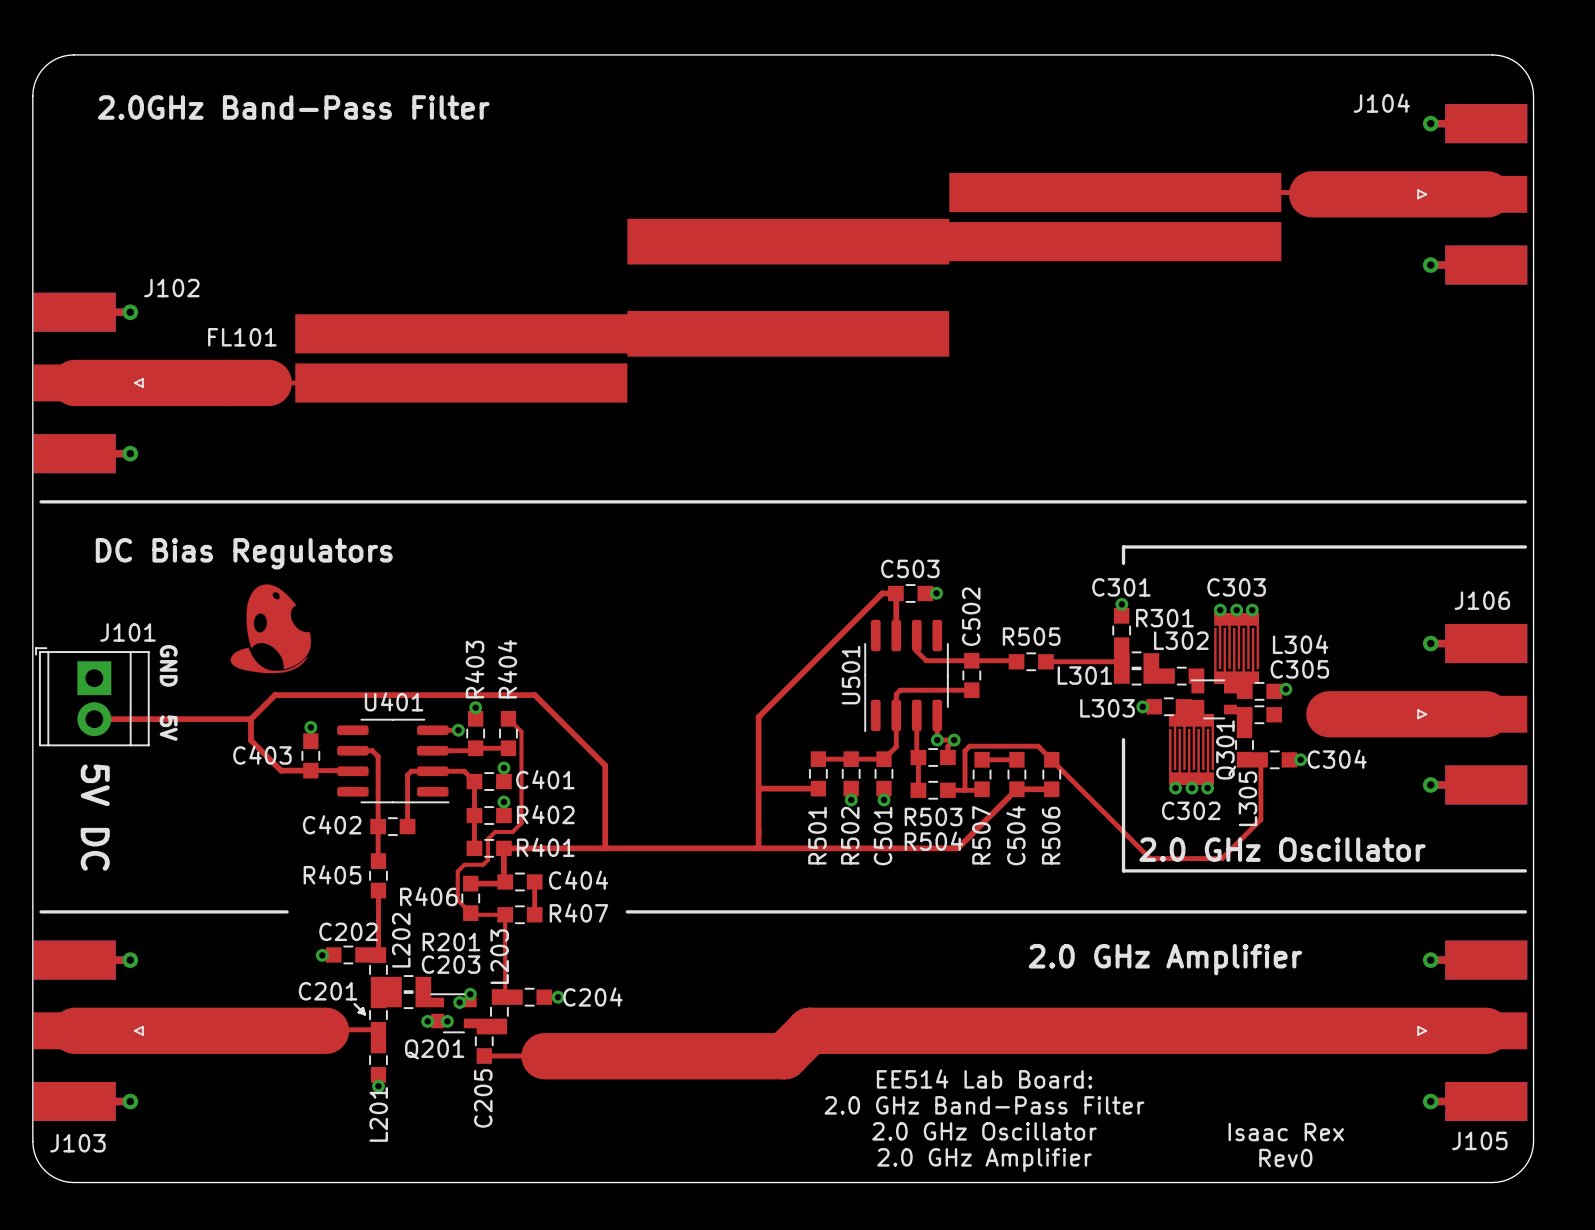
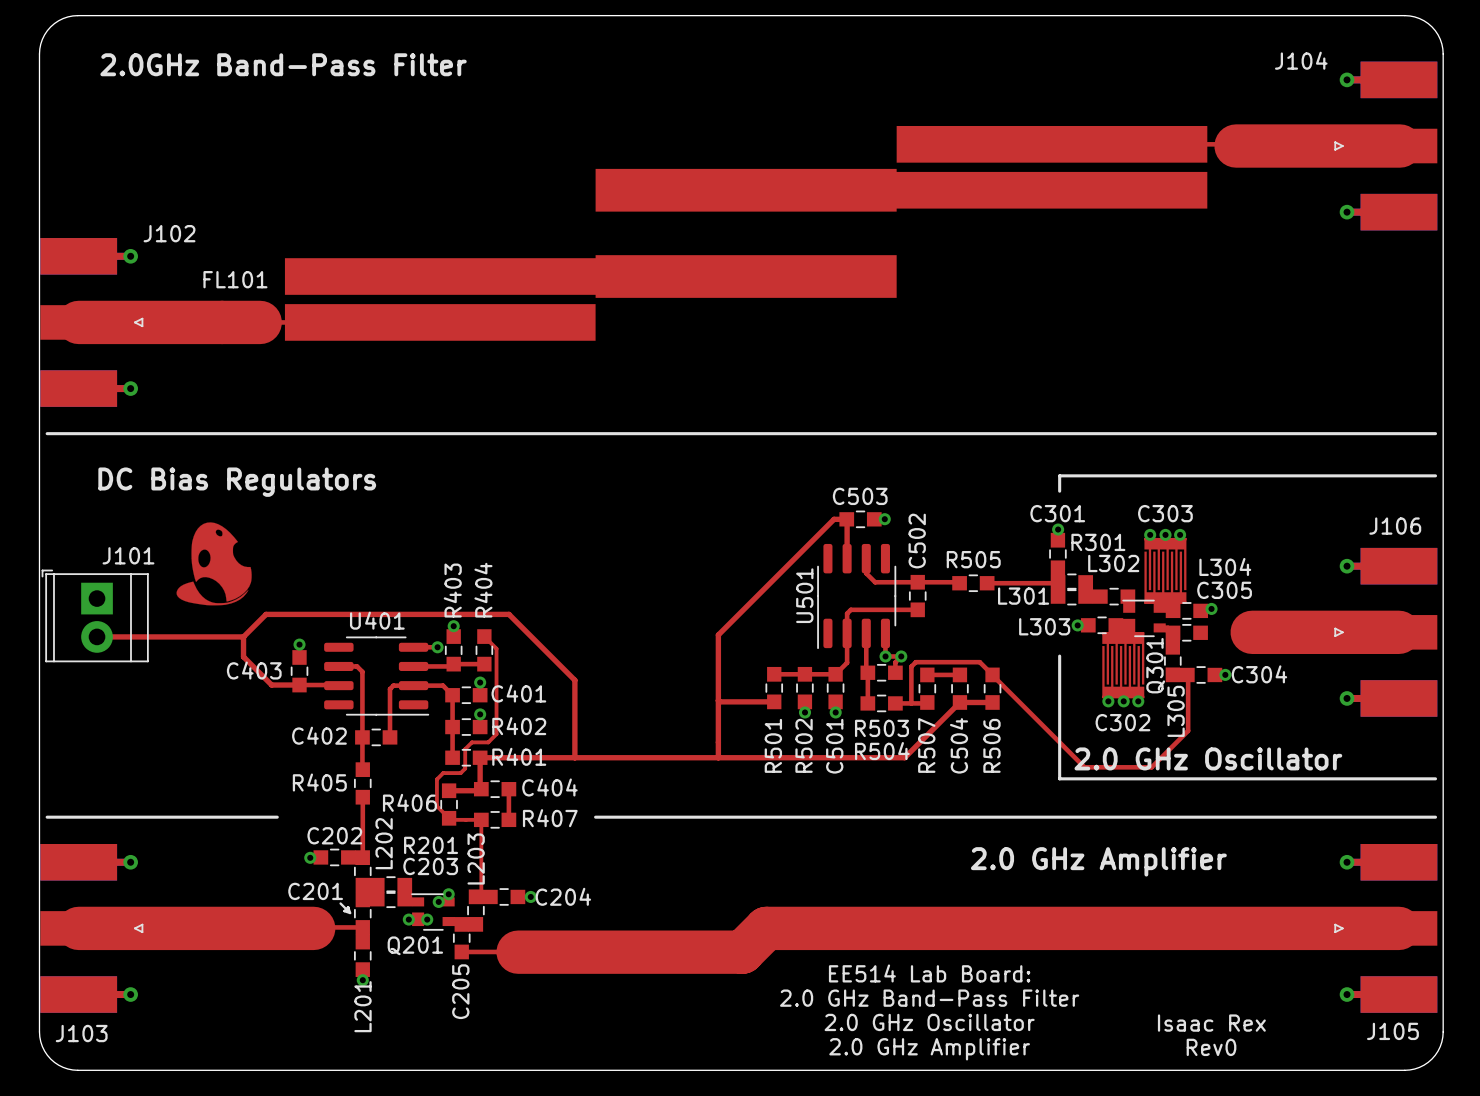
drawing position: (270, 628) -> (214, 563)
text: GND (168, 665) -> none
text: 5V (168, 728) -> none
text: 5V DC (95, 817) -> none

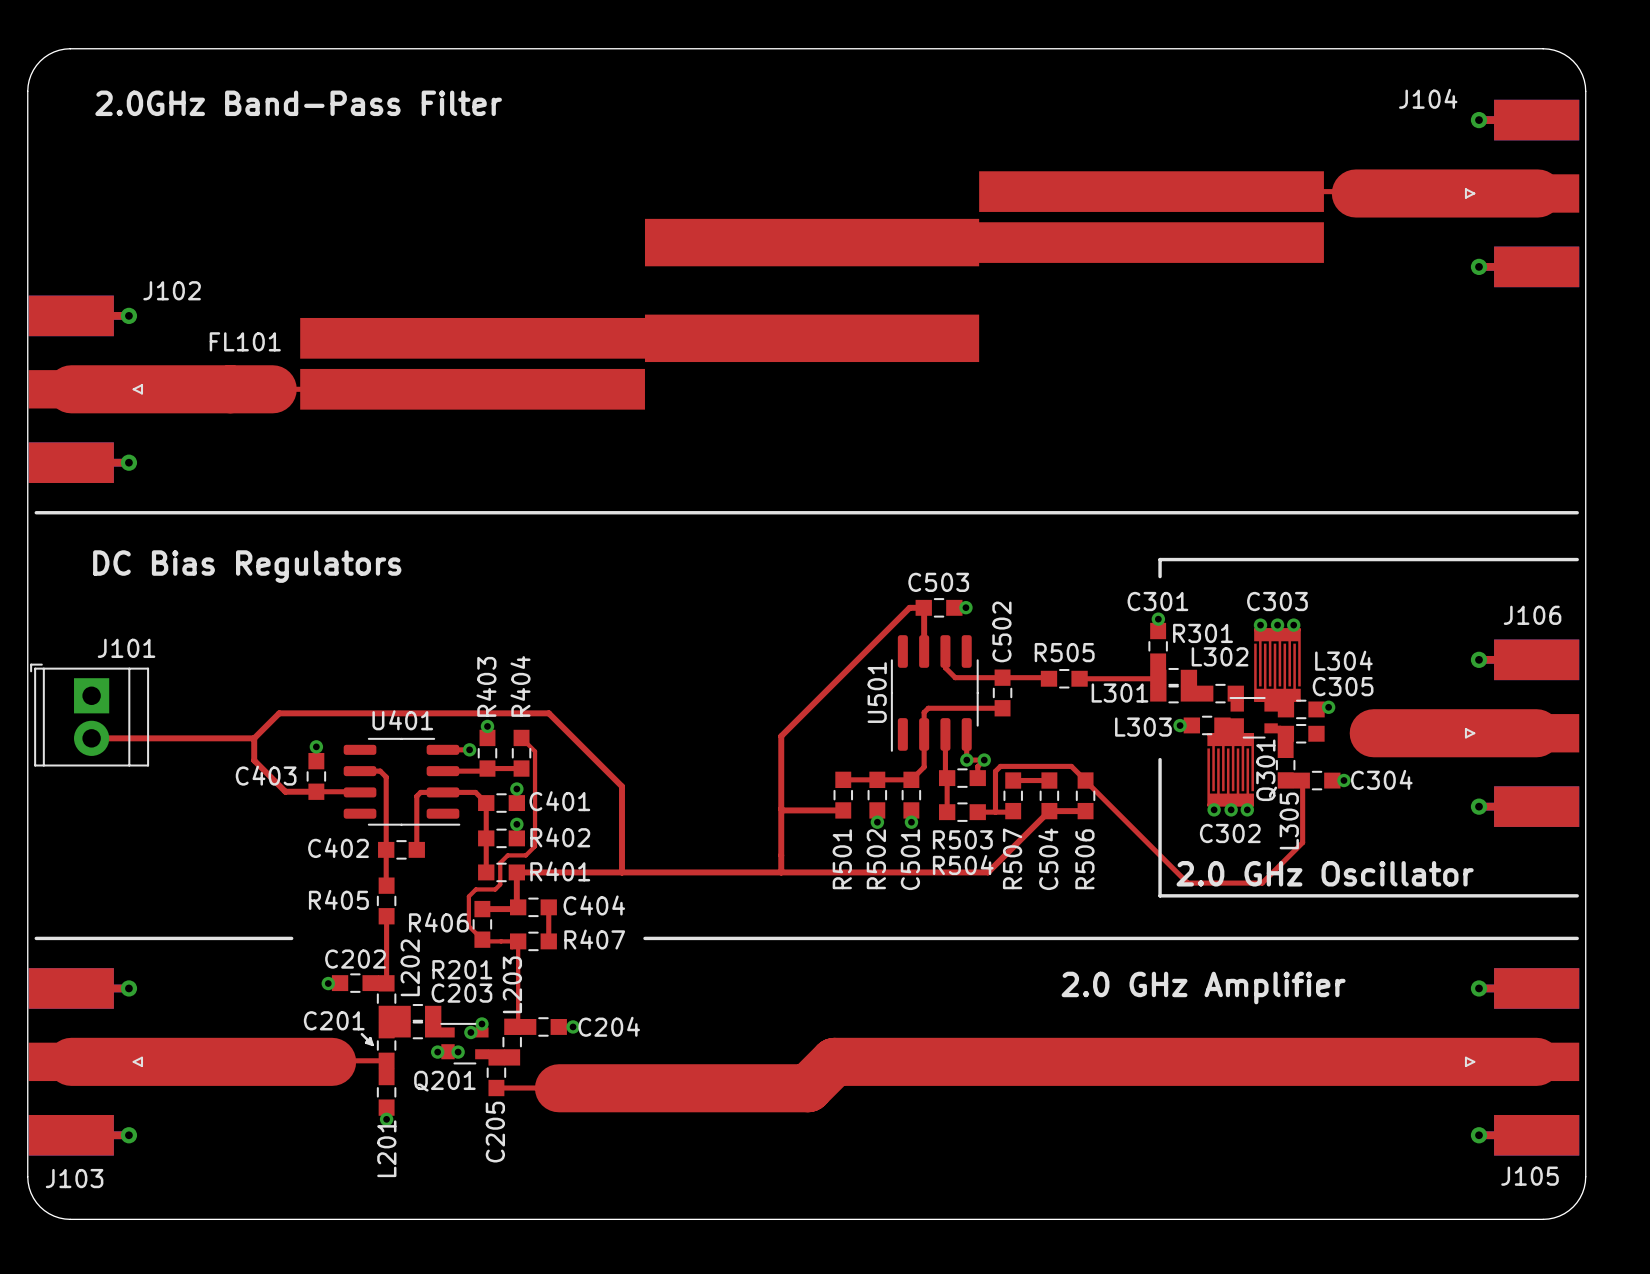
drawing: [176, 522, 252, 606] -> none
text: EE514 Lab Board: (929, 973) -> none
text: 2.0 GHz Band-Pass Filter (929, 998) -> none
text: 2.0 GHz Oscillator (929, 1022) -> none
text: Isaac Rex (1211, 1023) -> none
text: Rev0 (1211, 1047) -> none
text: 2.0 GHz Amplifier (929, 1049) -> none

